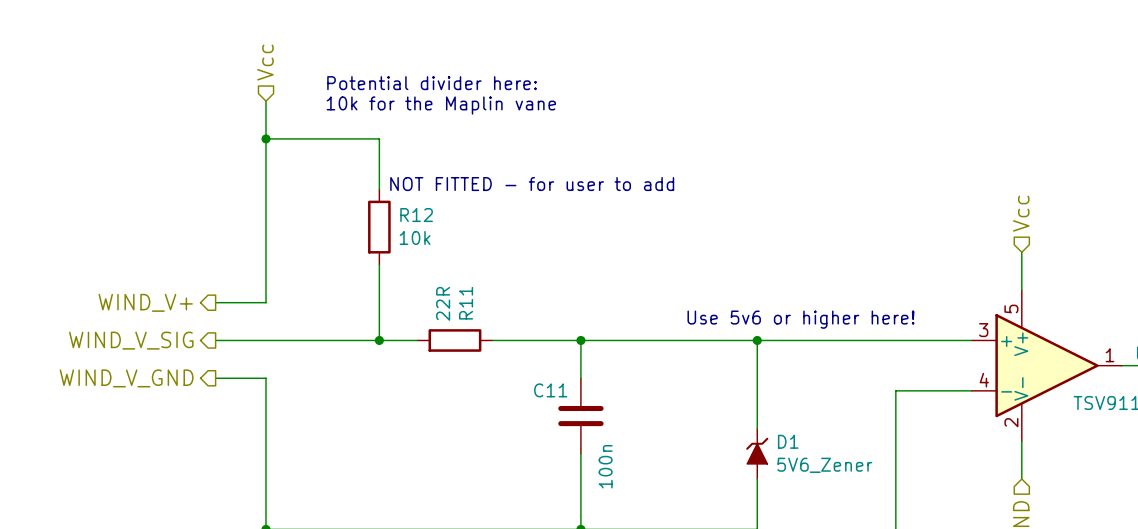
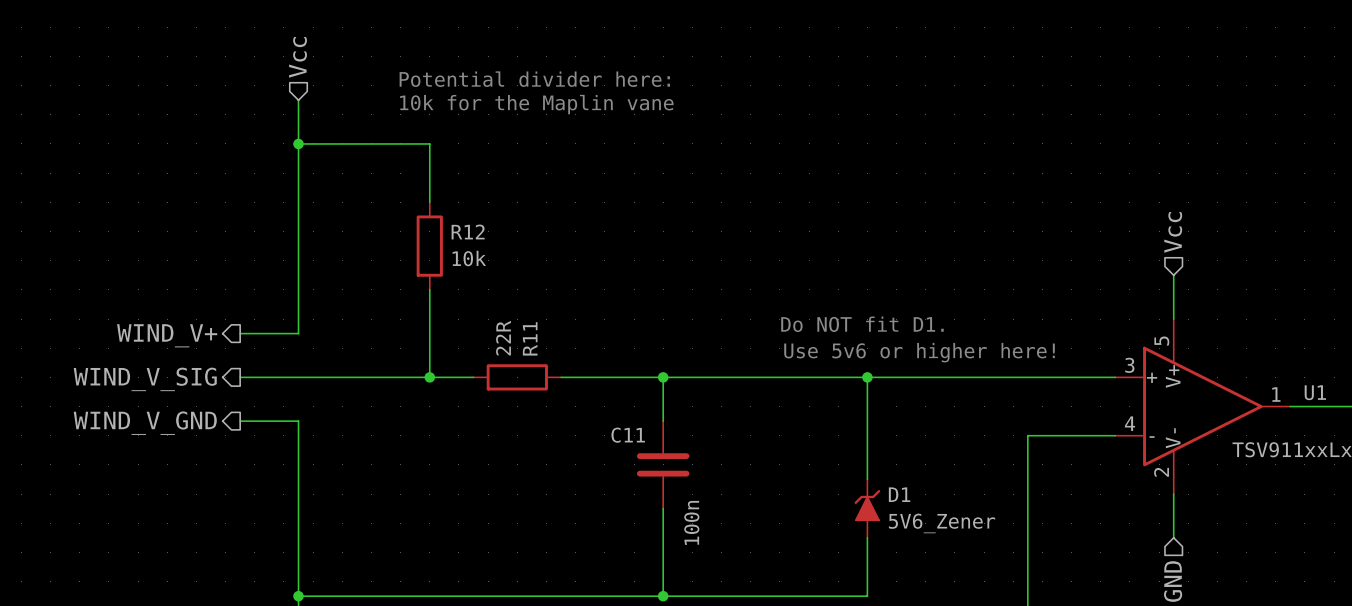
text position: Potential divider here: (432, 83) -> Potential divider here: (534, 79)
text position: 10k for the Maplin vane (441, 105) -> 10k for the Maplin vane (536, 104)
text: NOT FITTED - for user to add (532, 184) -> none
text: none -> Do NOT fit D1. (862, 324)

